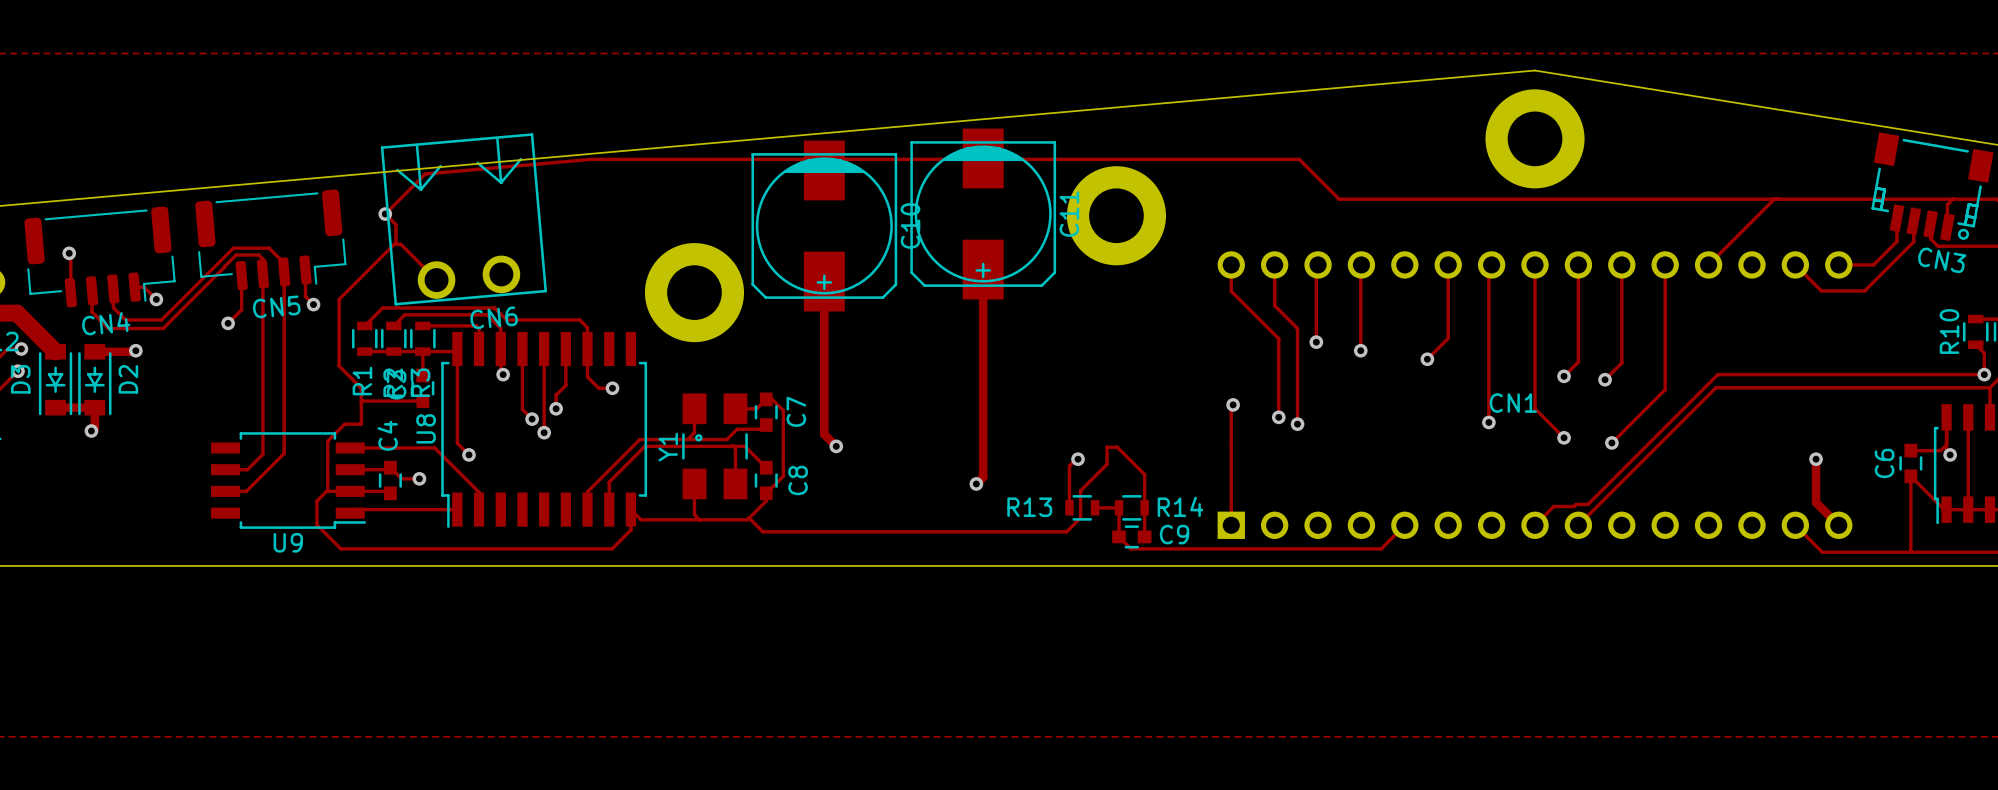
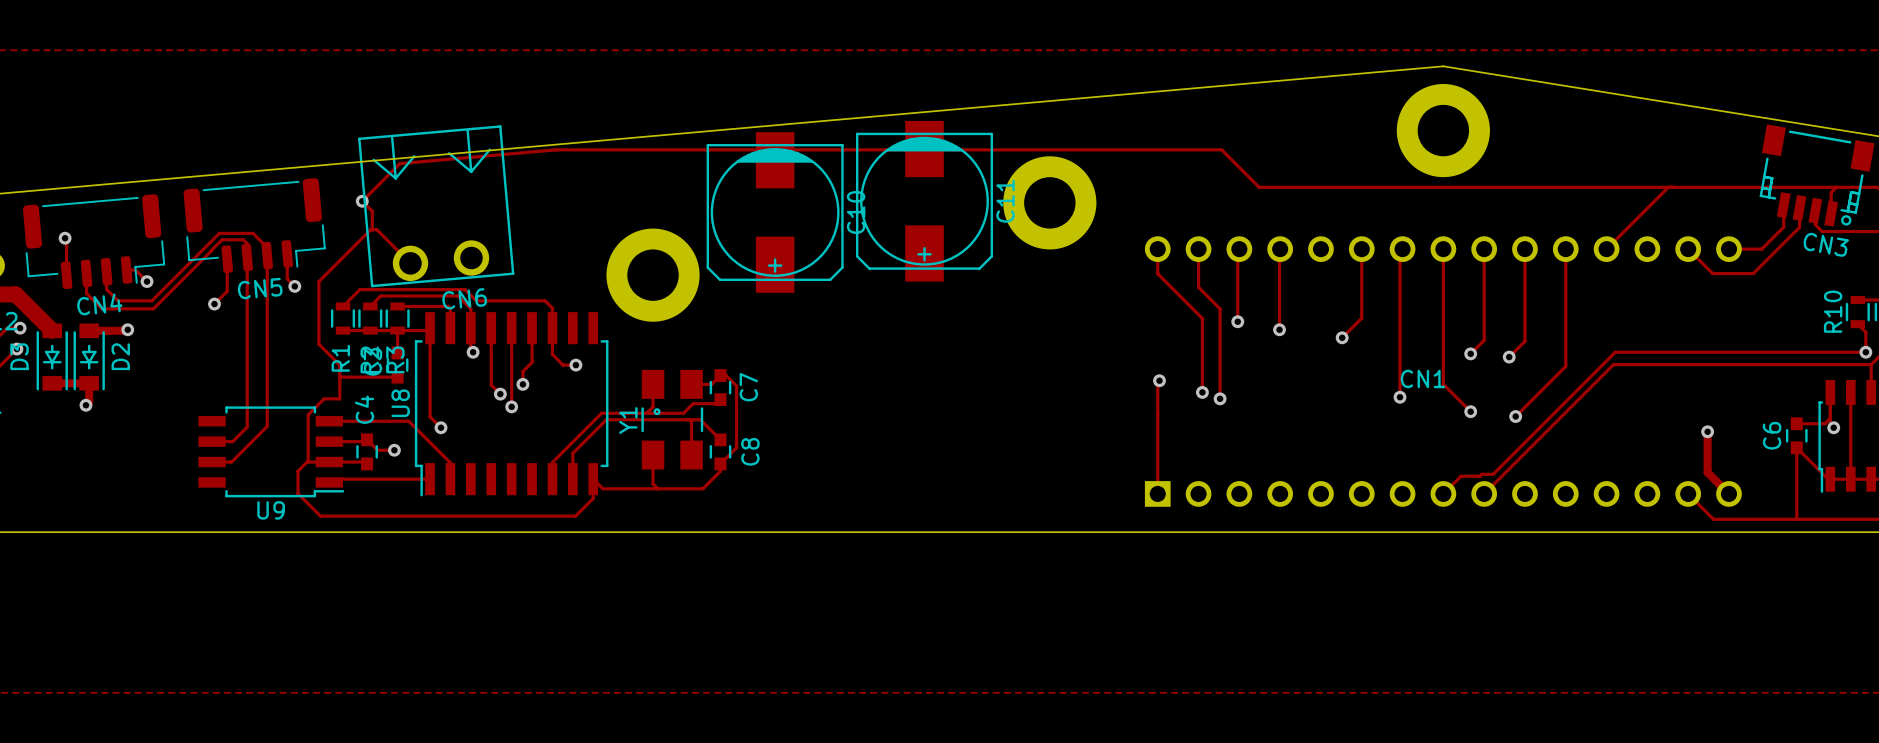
track: (983, 269) (983, 477) (976, 483) -> none
track: (824, 281) (824, 434) (836, 446) -> none
via: (836, 446) -> none
track: (1078, 459) (1069, 466) (1069, 507) -> none
via: (1078, 459) -> none
via: (976, 483) -> none
R13: (1082, 507) -> none
track: (1095, 507) (1119, 507) (1119, 536) (1130, 548) (1381, 548) (1404, 525) -> none
R14: (1131, 507) -> none
track: (749, 518) (762, 531) (1066, 531) (1080, 517) (1080, 490) (1107, 464) (1107, 447) (1117, 447) (1144, 474) (1144, 536) -> none
C9: (1131, 536) -> none

